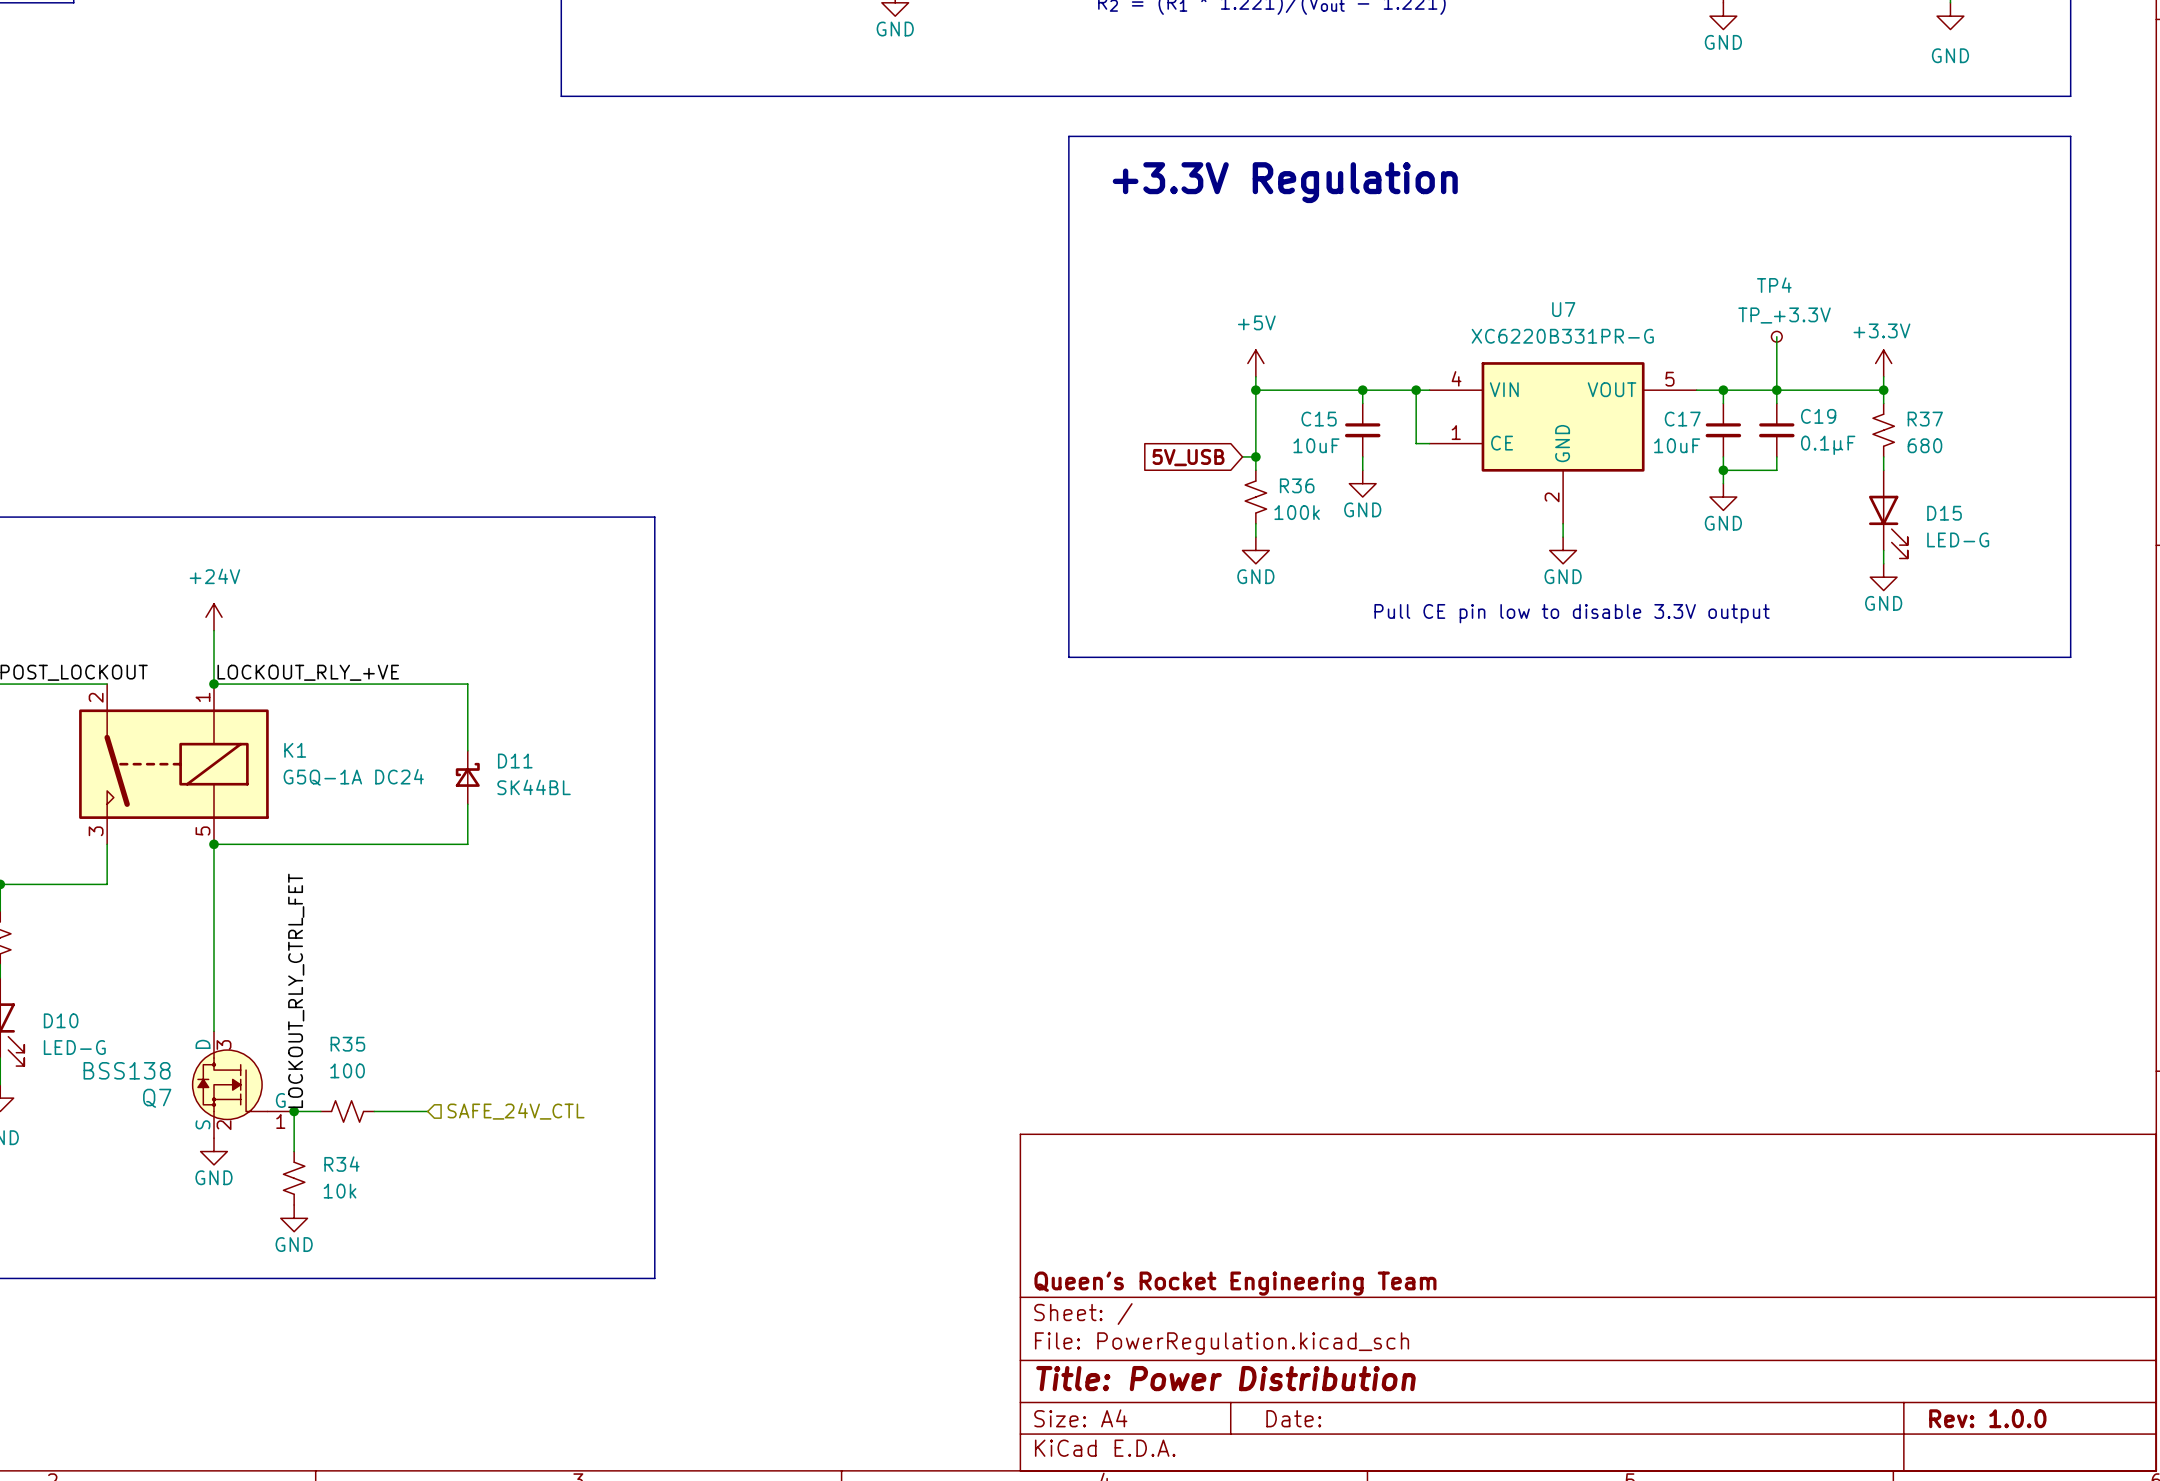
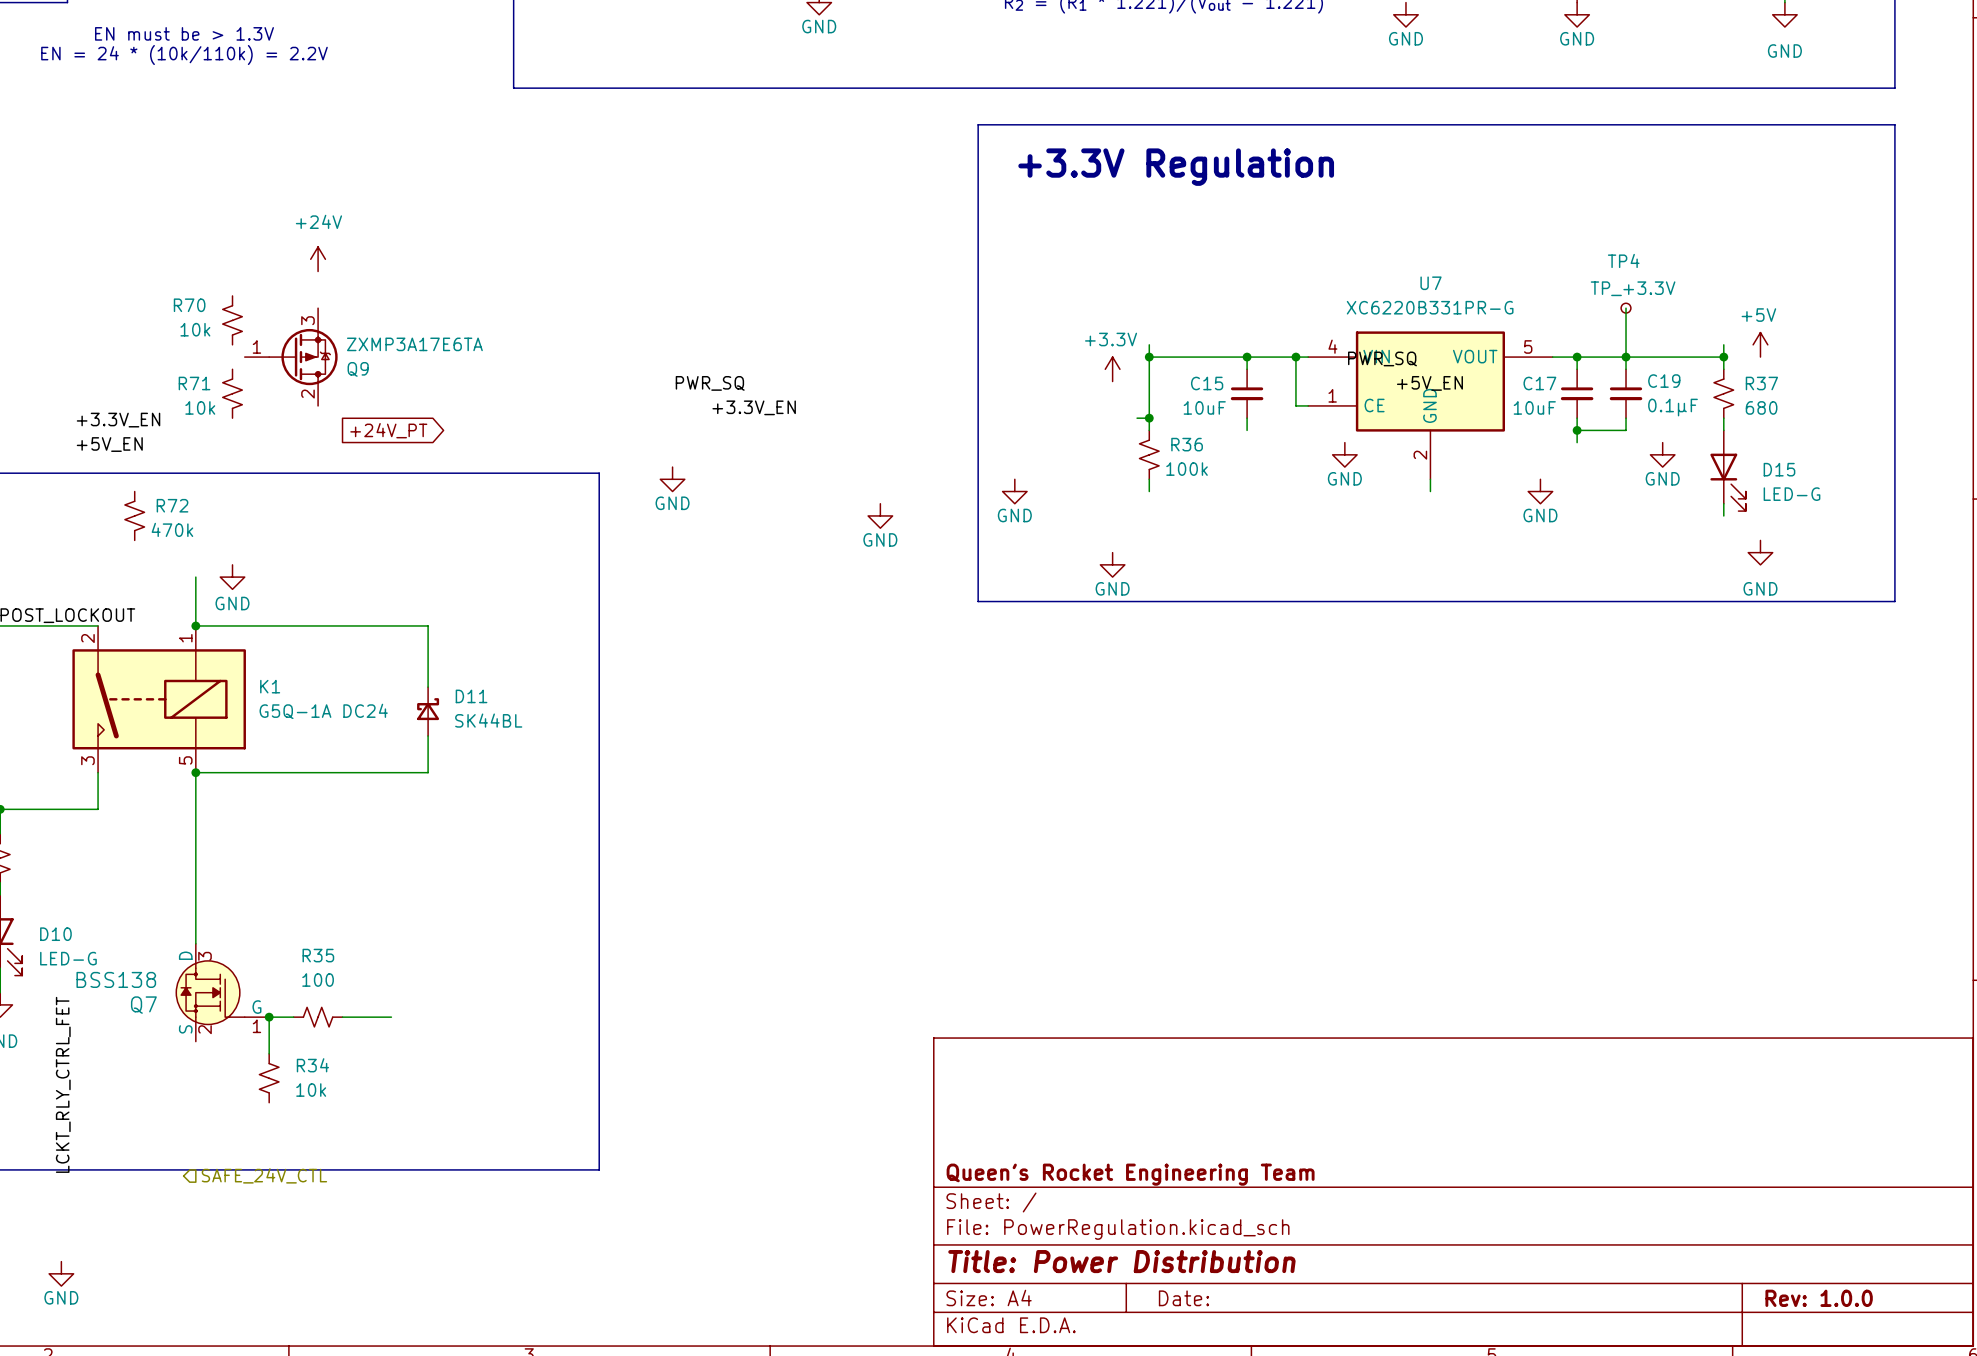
power symbol: none -> GND (1405, 14)
text: none -> EN must be > 1.3V (184, 33)
text: none -> EN = 24 * (10k/110k) = 2.2V (184, 55)
power symbol: none -> +24V (318, 259)
R70: none -> 10k (232, 320)
power symbol: +5V (1255, 363) -> none
power symbol: +3.3V (1883, 363) -> none
power symbol: none -> +5V (1760, 344)
Q9: none -> ZXMP3A17E6TA (291, 357)
label: none -> PWR_SQ (1382, 358)
power symbol: none -> +3.3V (1112, 369)
label: none -> PWR_SQ (710, 383)
label: none -> +5V_EN (1429, 383)
R71: none -> 10k (232, 393)
label: none -> +3.3V_EN (754, 407)
global label: 5V_USB (1188, 457) -> none
label: none -> +3.3V_EN (118, 420)
global label: none -> +24V_PT (388, 430)
power symbol: GND (1362, 483) -> none
label: none -> +5V_EN (109, 444)
power symbol: none -> GND (1344, 454)
power symbol: GND (1723, 497) -> none
power symbol: none -> GND (1662, 454)
power symbol: none -> GND (672, 479)
power symbol: none -> GND (1014, 491)
power symbol: none -> GND (1540, 491)
power symbol: GND (1255, 550) -> none
power symbol: GND (1563, 550) -> none
R72: none -> 470k (134, 515)
power symbol: none -> GND (880, 515)
power symbol position: GND (1883, 577) -> GND (1760, 552)
power symbol text position: GND (1883, 603) -> GND (1760, 588)
text: Pull CE pin low to disable 3.3V output (1572, 613) -> none
power symbol: +24V (213, 617) -> none
power symbol: none -> GND (1112, 564)
power symbol: none -> GND (232, 577)
label: LOCKOUT_RLY_+VE (308, 672) -> none
label: LOCKOUT_RLY_CTRL_FET (296, 990) -> none
hierarchical label: SAFE_24V_CTL (516, 1111) -> none
power symbol: GND (213, 1151) -> none
label: none -> LCKT_RLY_CTRL_FET (63, 1084)
power symbol: GND (294, 1218) -> none
hierarchical label: none -> SAFE_24V_CTL (264, 1175)
power symbol: none -> GND (61, 1273)

